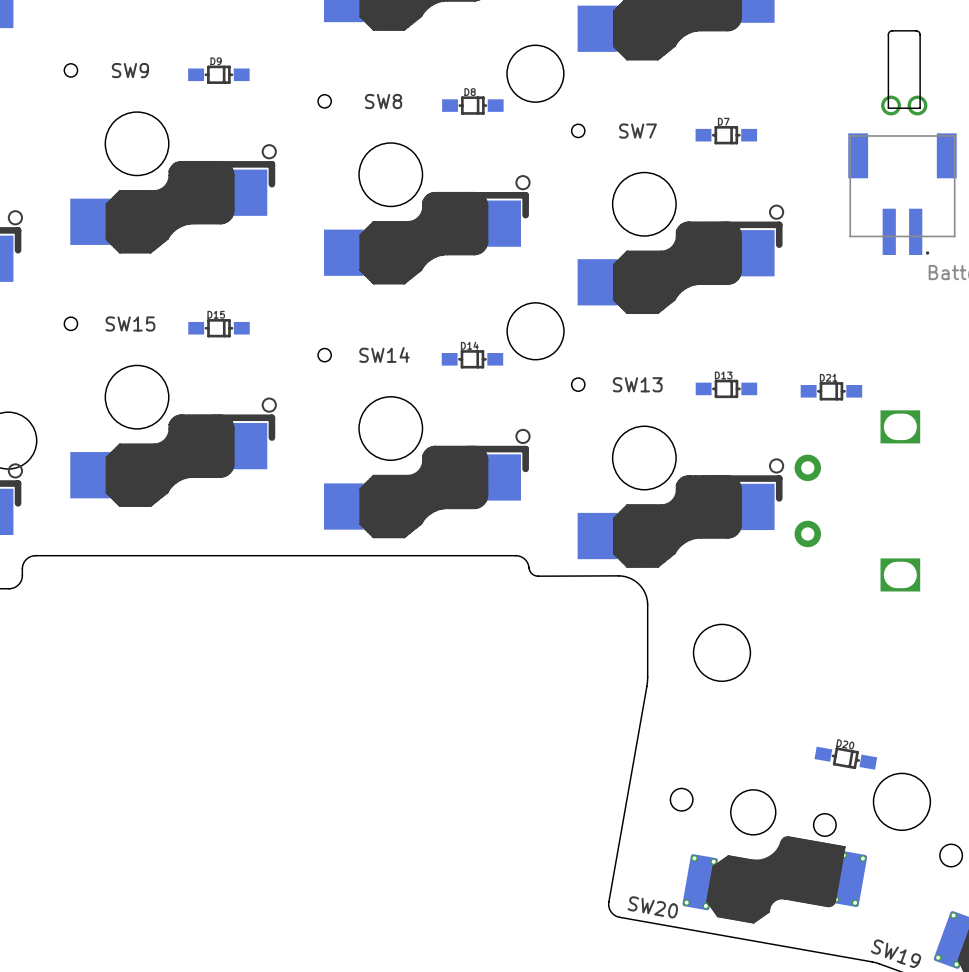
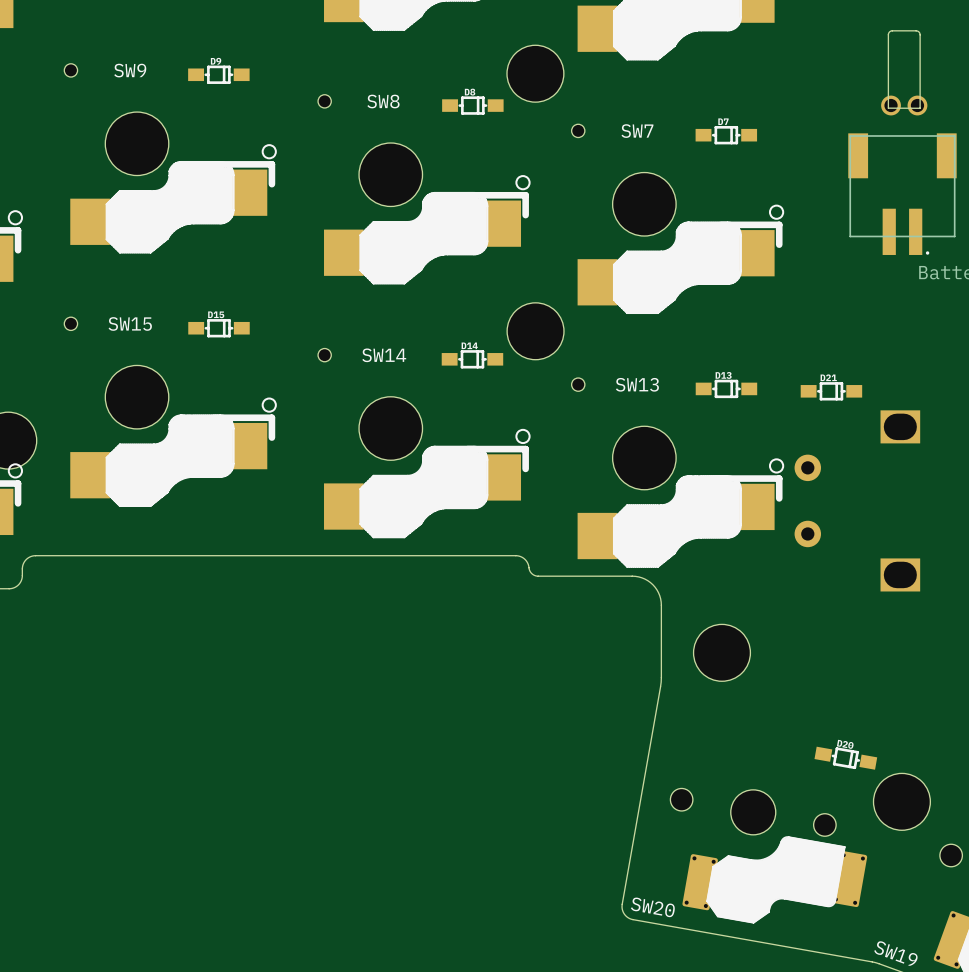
board edge: (538, 576) (625, 576) (639, 584) (646, 598) (647, 681) (608, 901) -> (538, 576) (638, 576) (652, 584) (660, 598) (661, 682) (622, 904) (625, 915) (632, 919) (872, 961)
board edge: (608, 901) (611, 911) (619, 917) (872, 961) -> none

